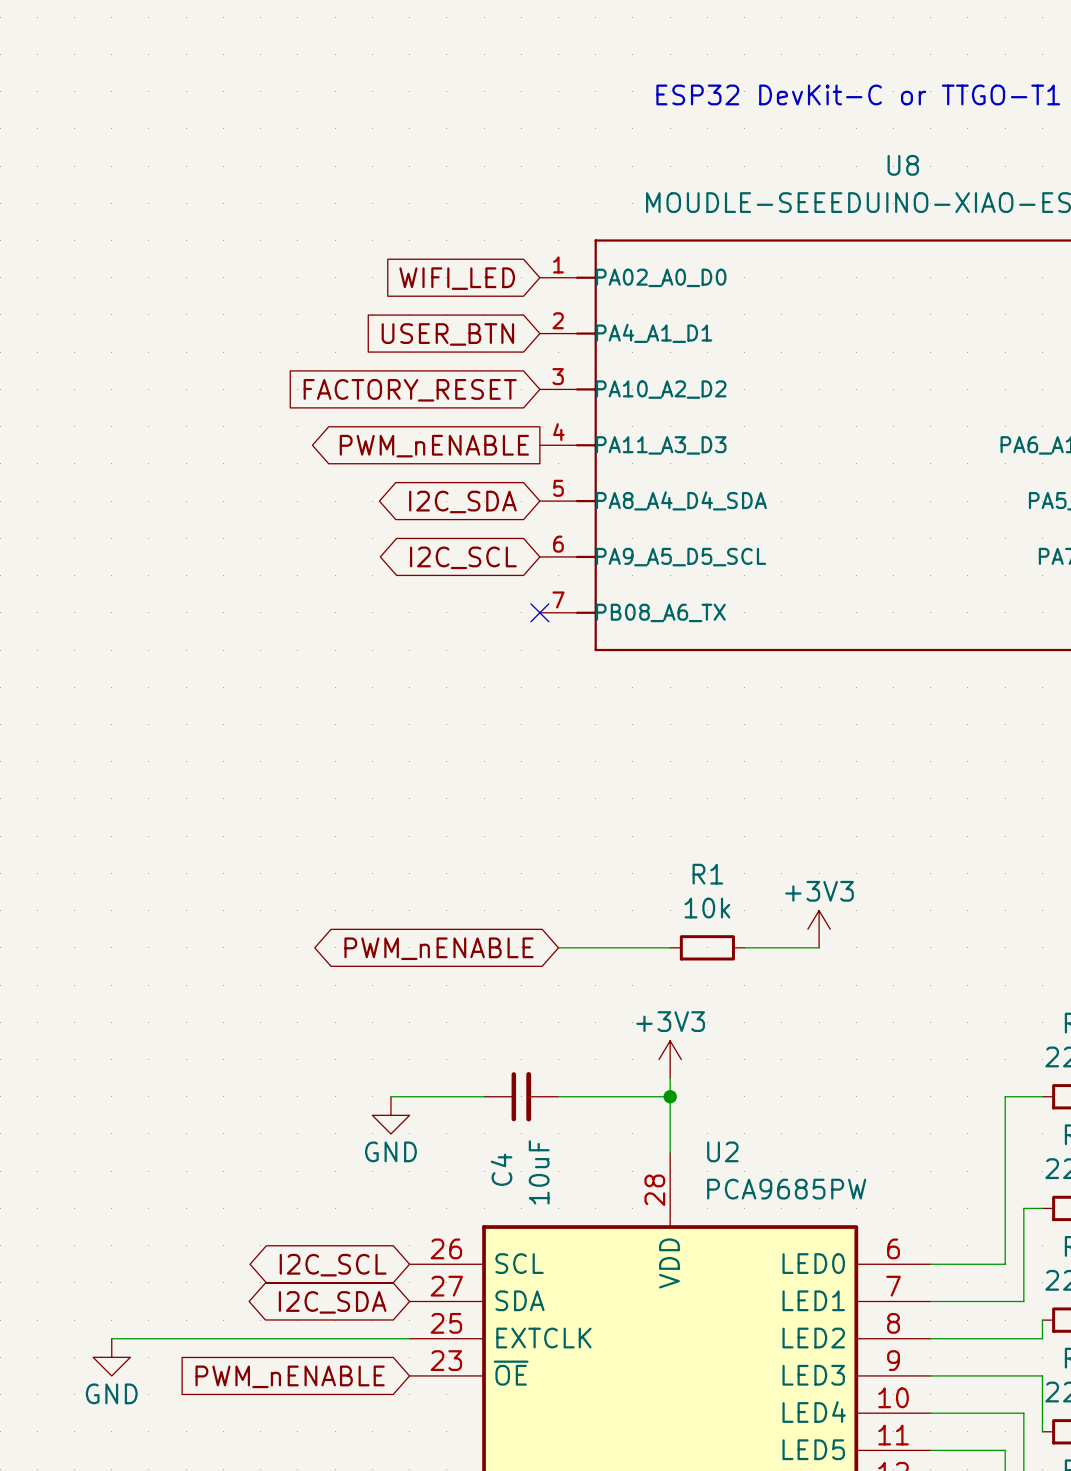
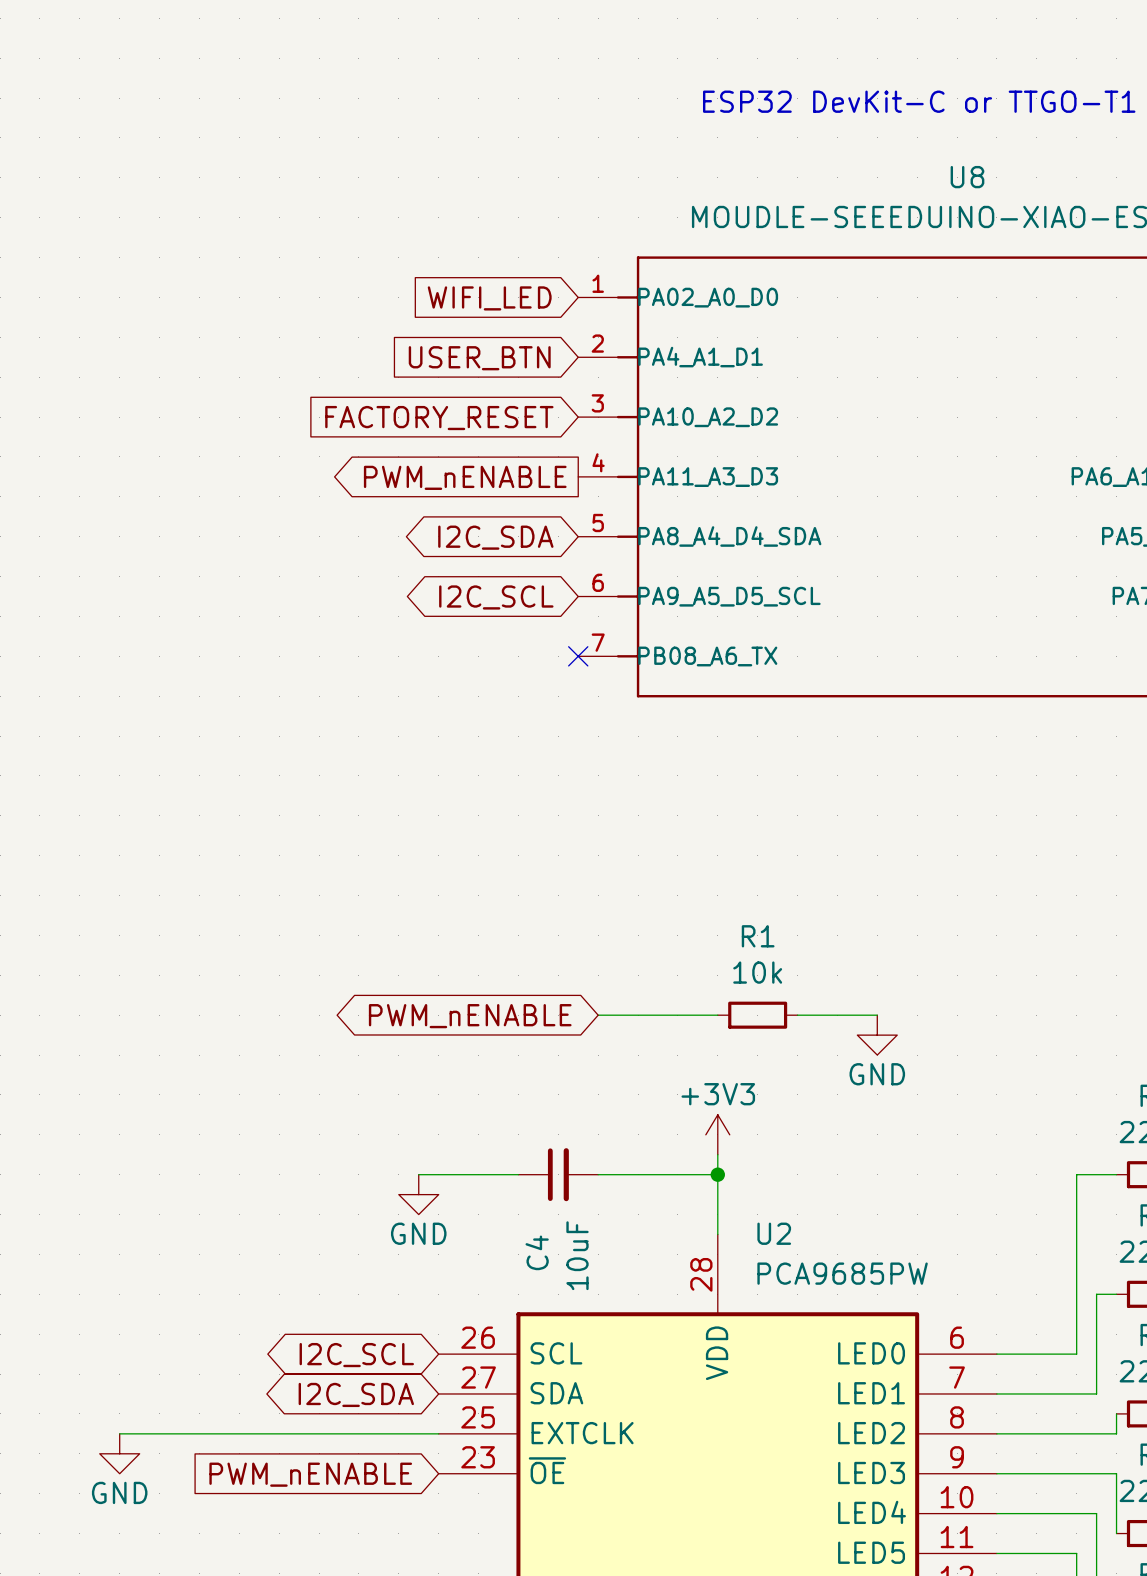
power symbol: +3V3 (819, 929) -> none
power symbol: none -> GND (877, 1035)

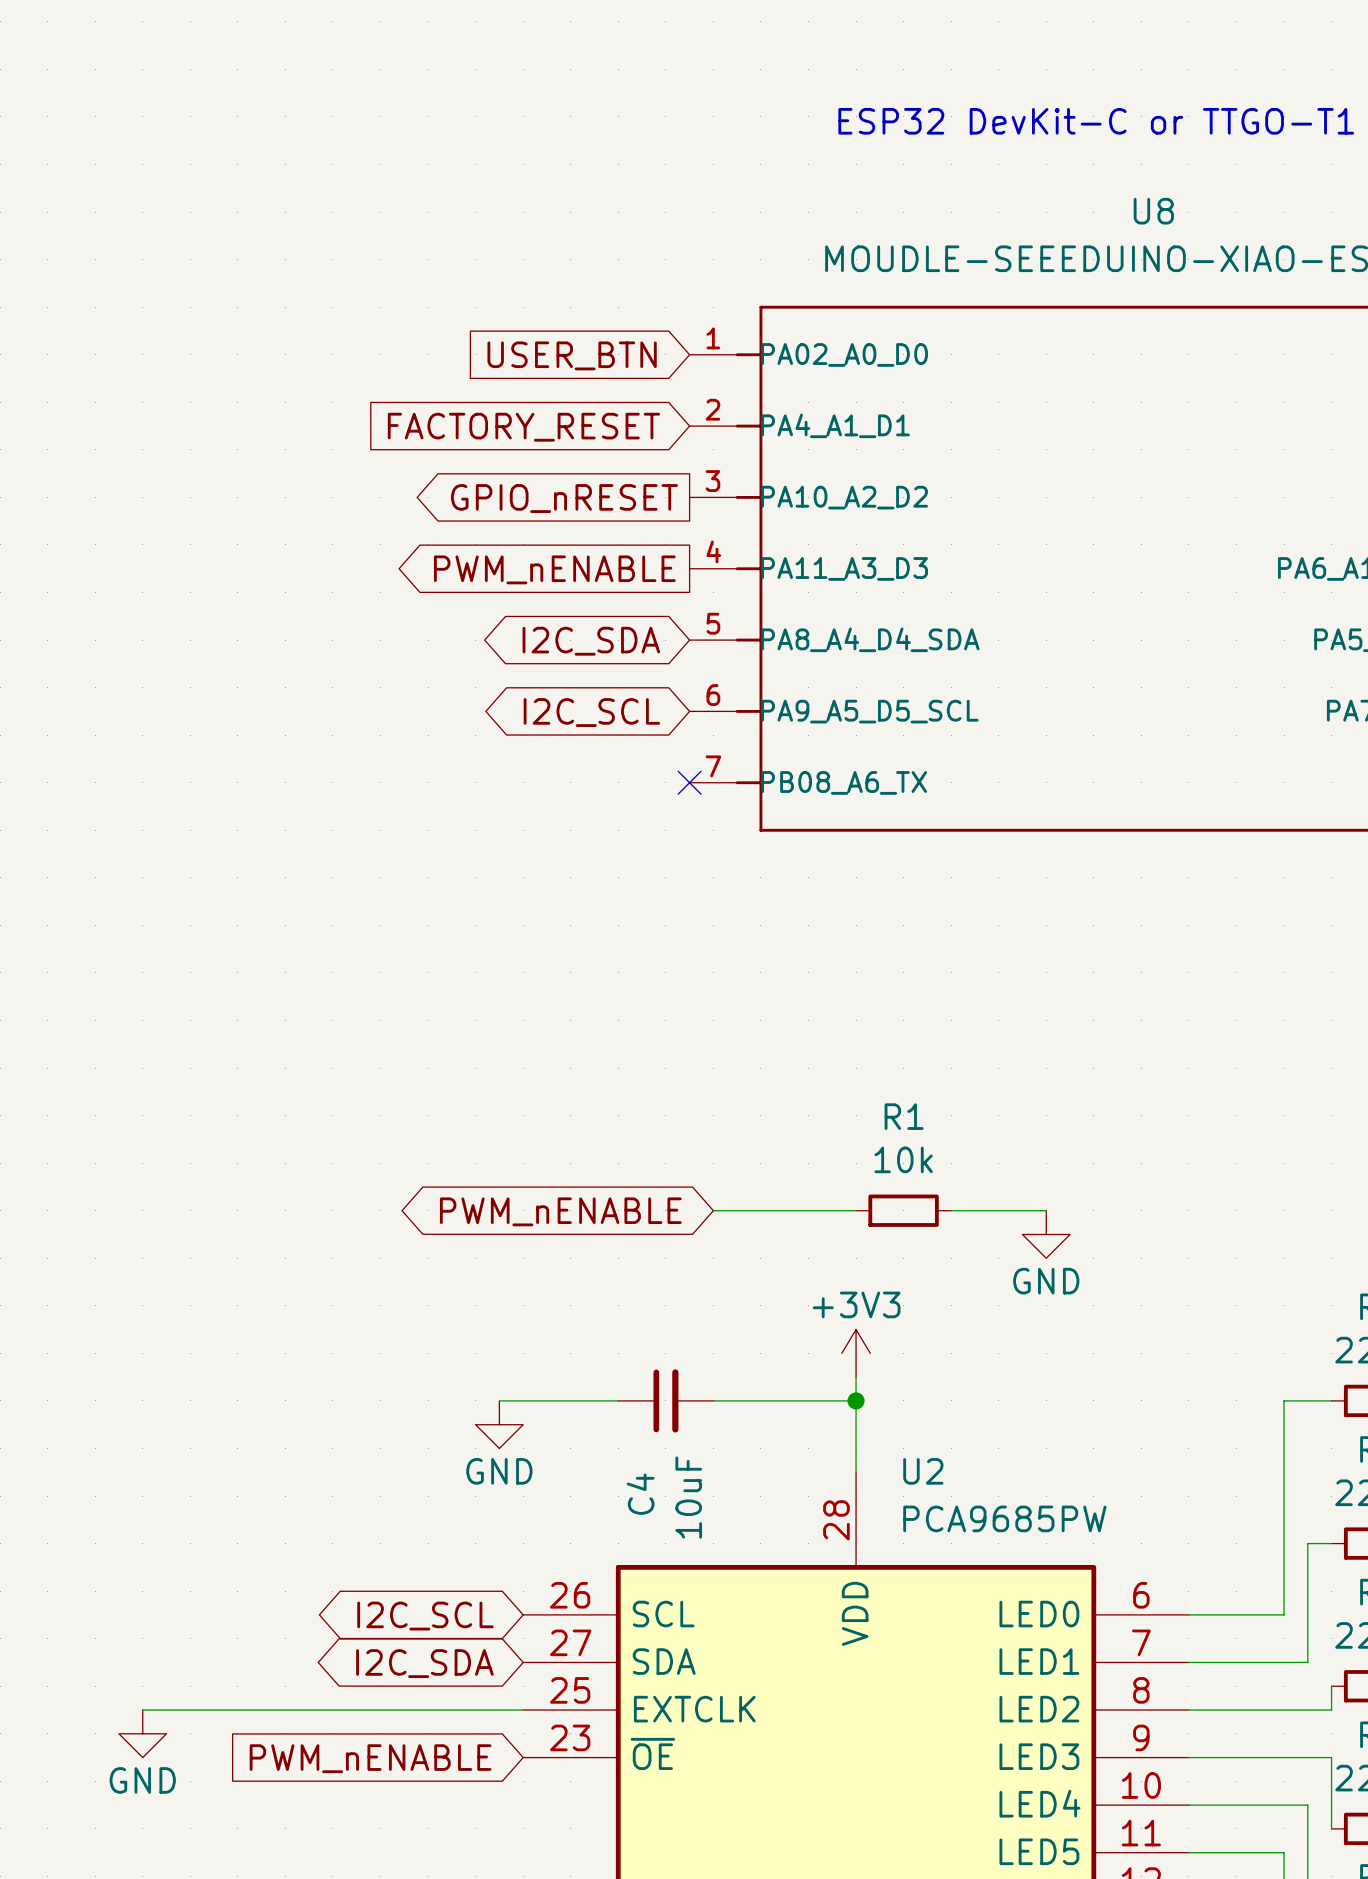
global label: WIFI_LED (489, 298) -> USER_BTN (572, 355)
global label: USER_BTN (479, 358) -> FACTORY_RESET (523, 427)
global label shape: input (439, 418) -> output (564, 498)
global label: FACTORY_RESET (439, 418) -> GPIO_nRESET (564, 498)

